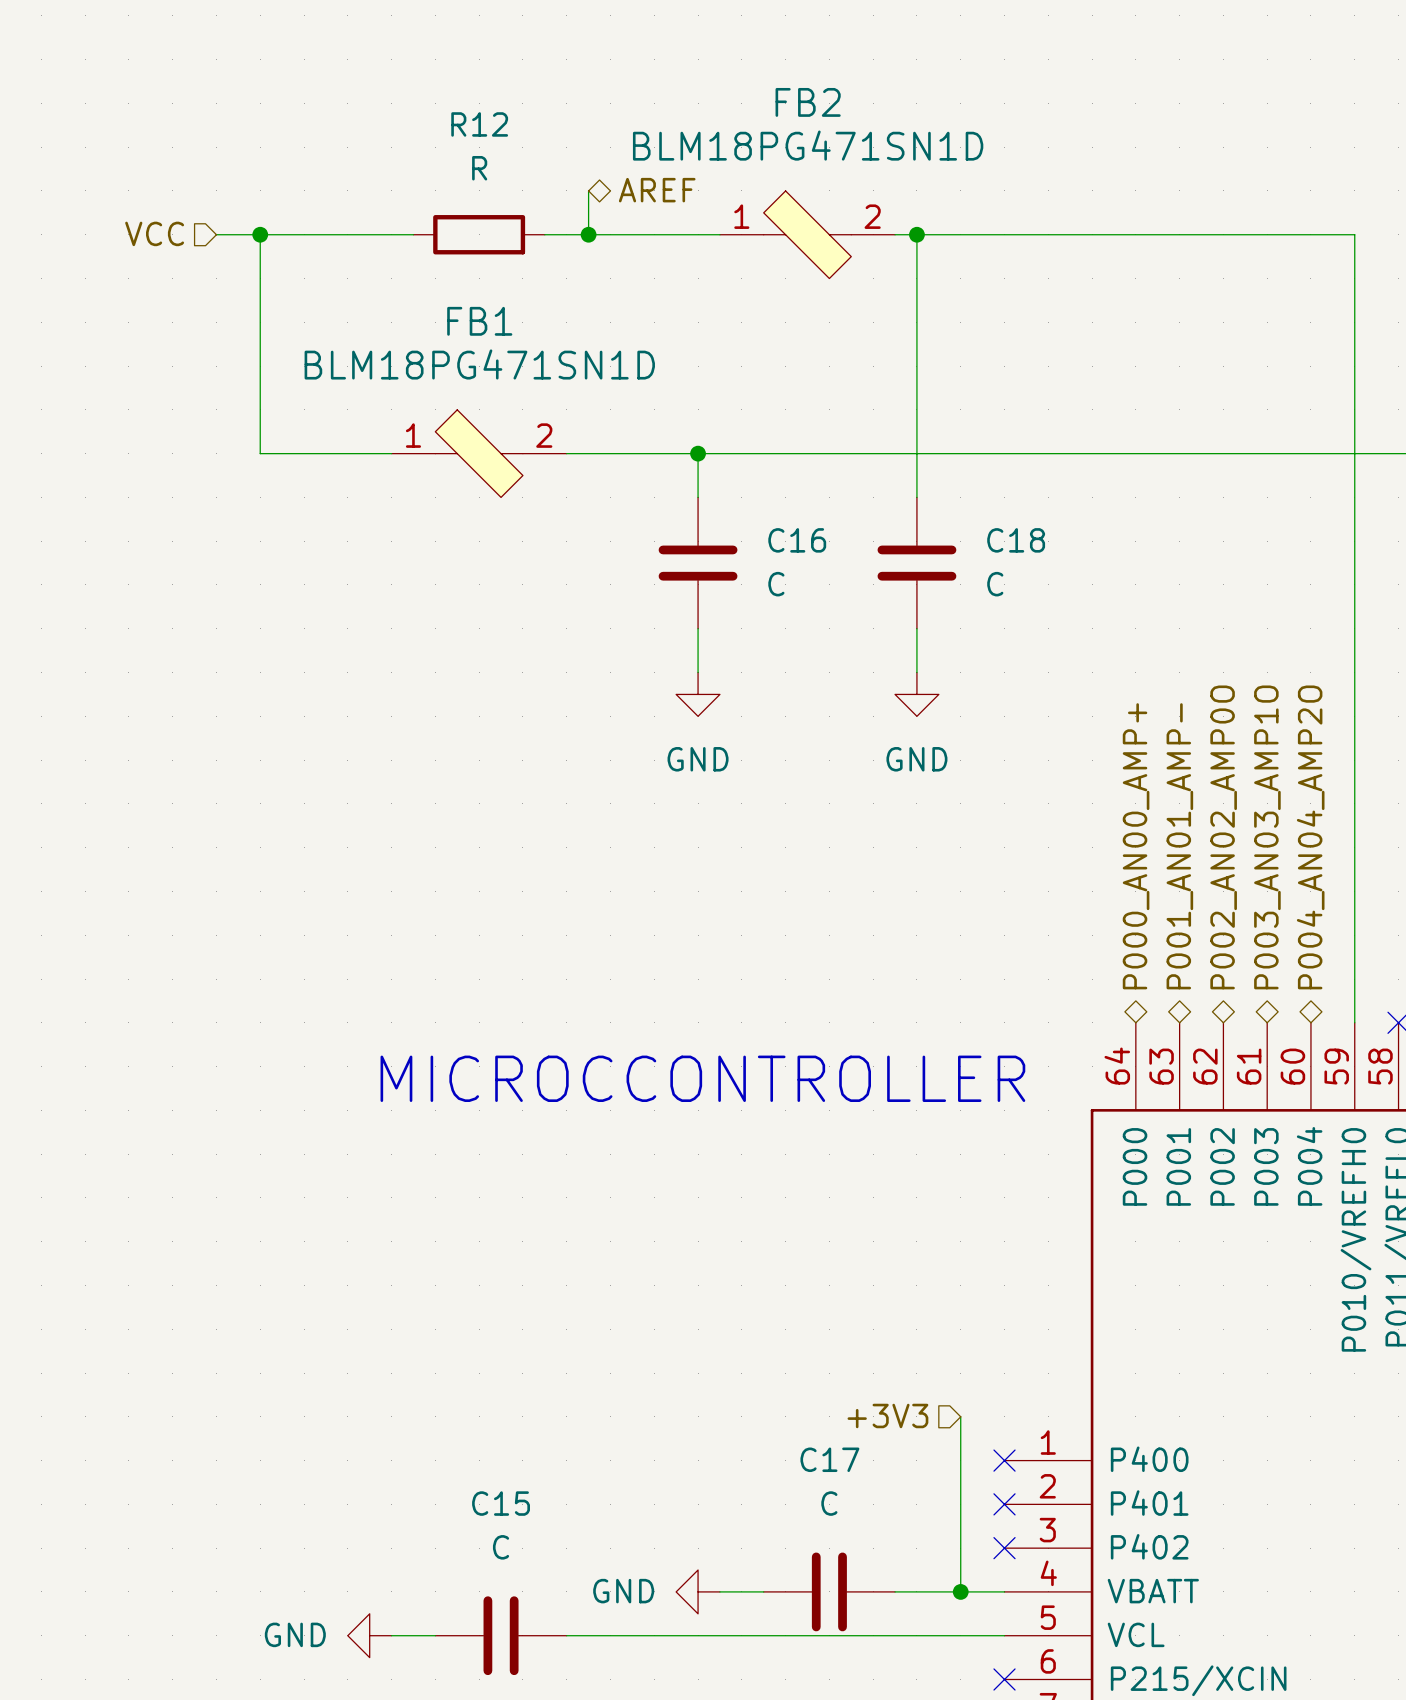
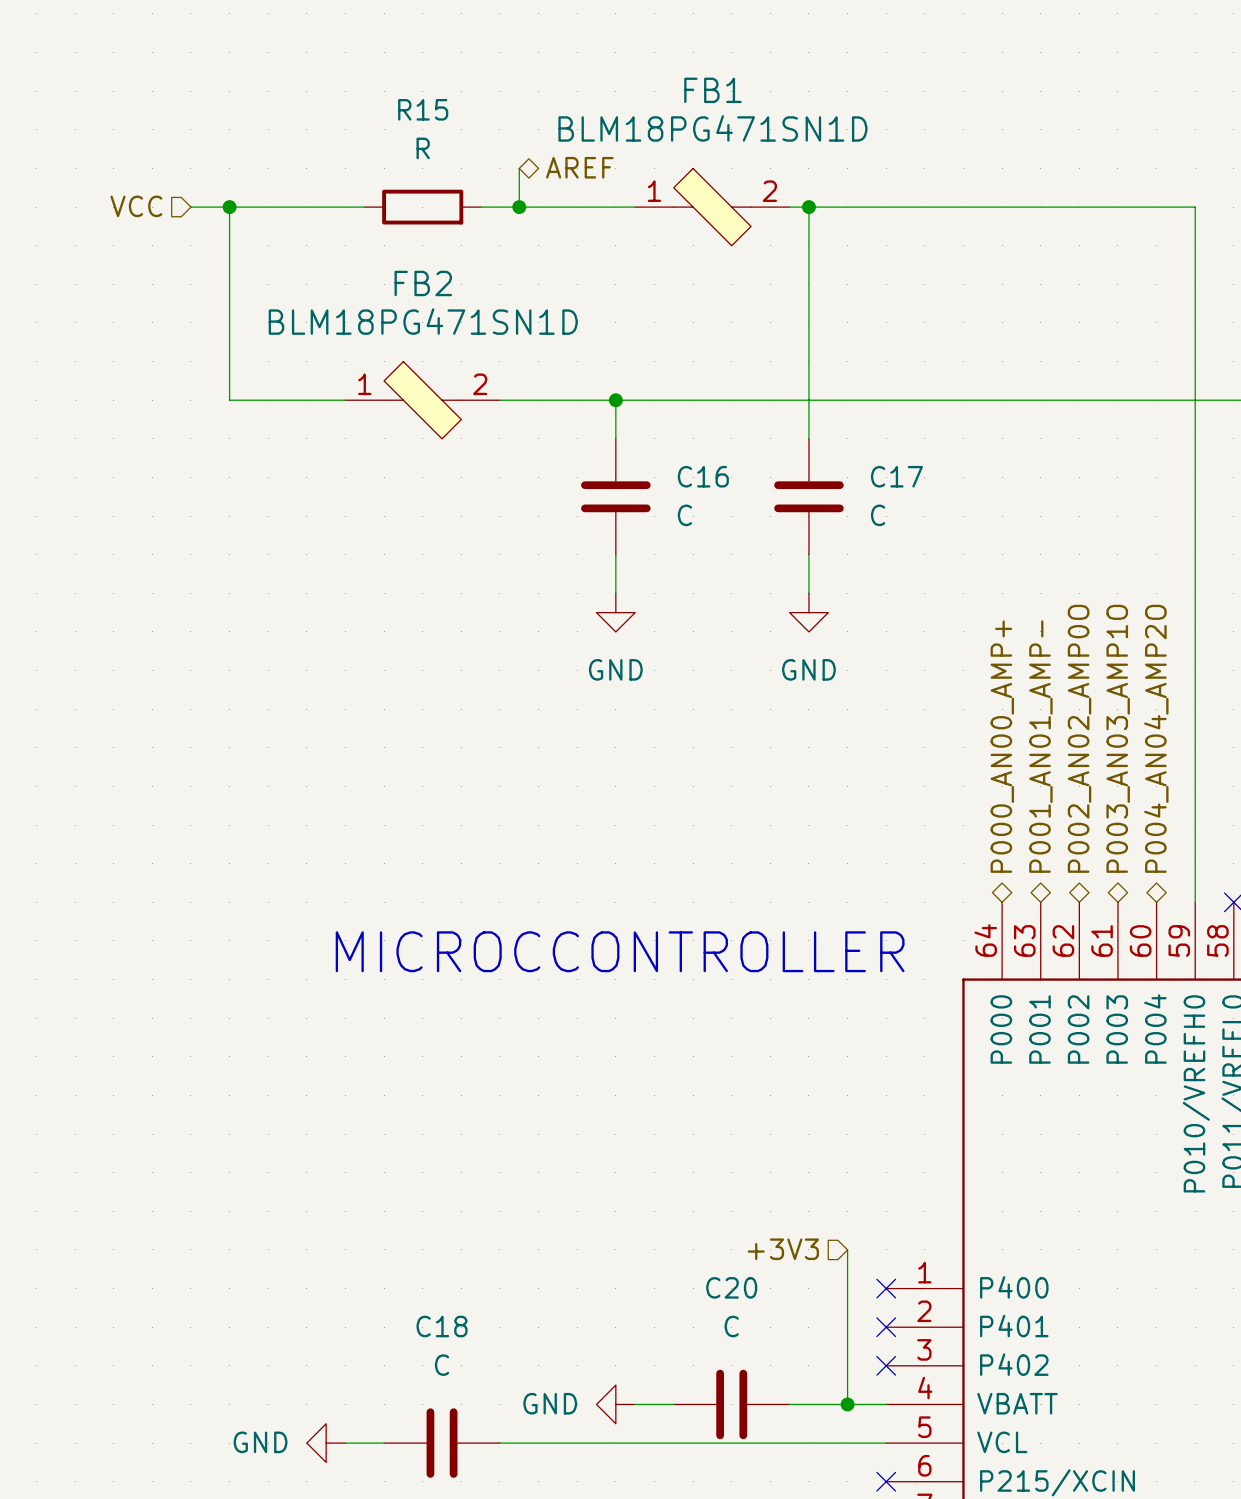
FB2 name: FB2 (808, 102) -> FB1 (712, 90)
R12 name: R12 (479, 124) -> R15 (423, 109)
FB1 name: FB1 (479, 321) -> FB2 (423, 283)
C18 name: C18 (1016, 540) -> C17 (896, 476)
C17 name: C17 (829, 1459) -> C20 (731, 1287)
C15 name: C15 (501, 1503) -> C18 (442, 1326)

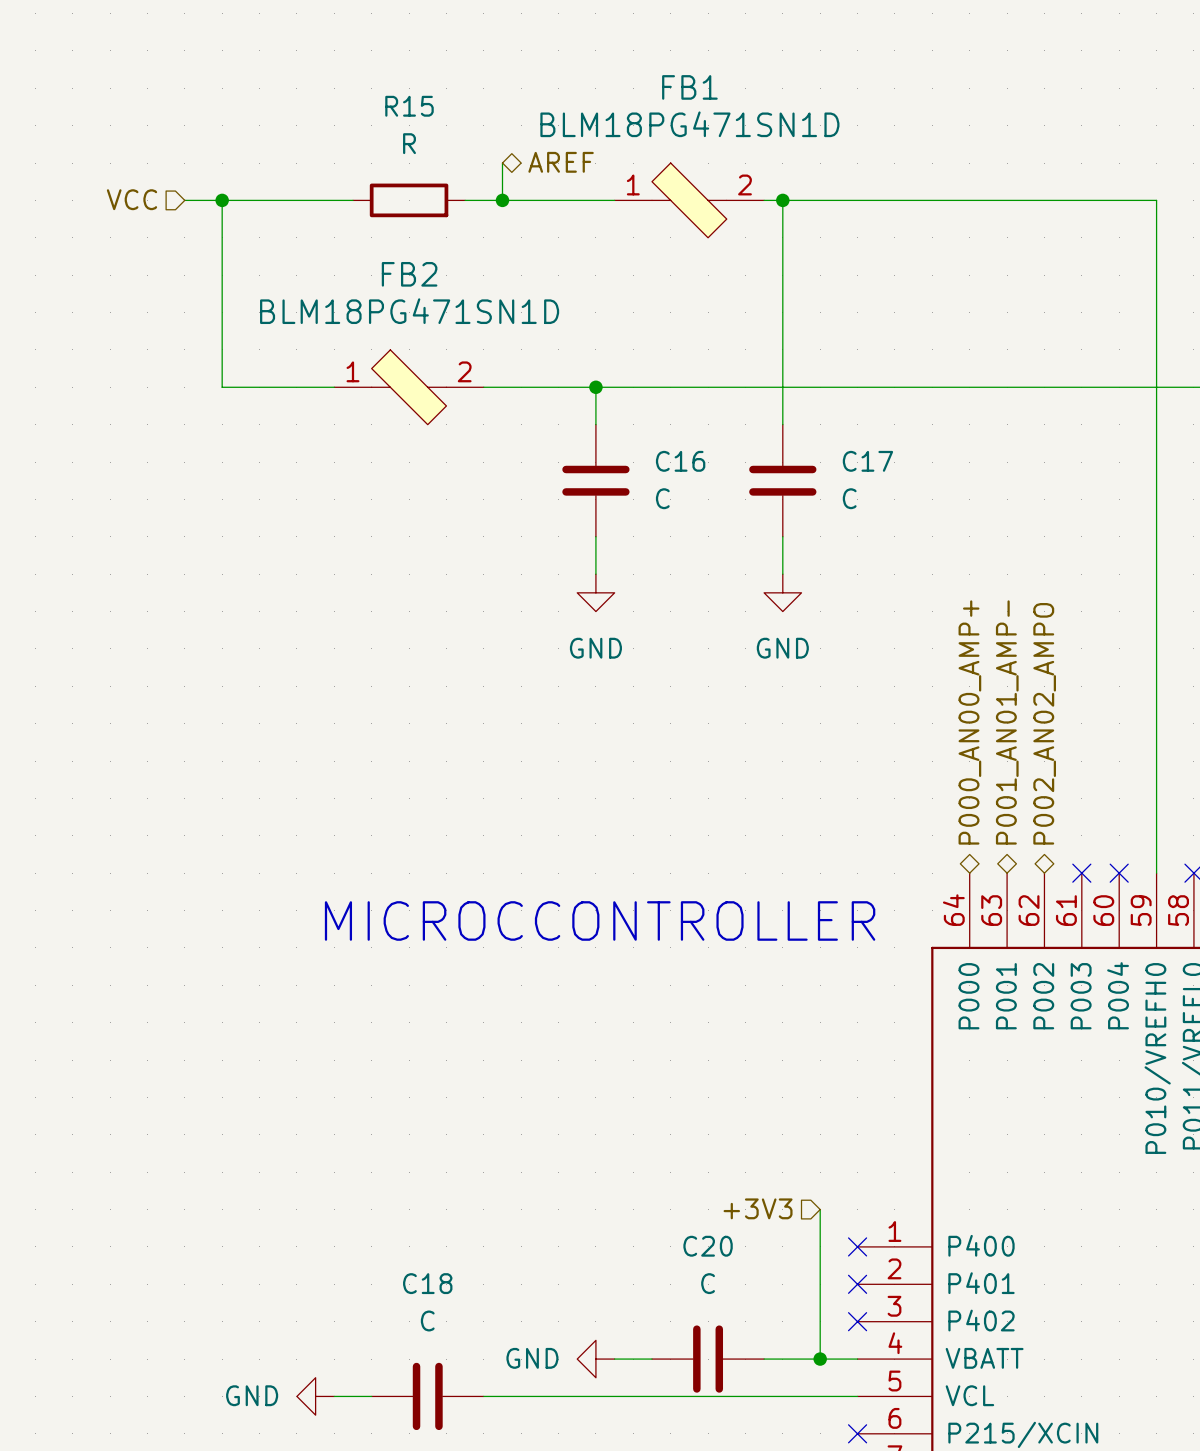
hierarchical label: P002_AN02_AMP0O (1079, 738) -> P002_AN02_AMPO (1044, 723)
hierarchical label: P003_AN03_AMP1O (1118, 738) -> none
hierarchical label: P004_AN04_AMP2O (1156, 738) -> none
no-connect mark: none -> (1081, 873)
no-connect mark: none -> (1119, 873)

